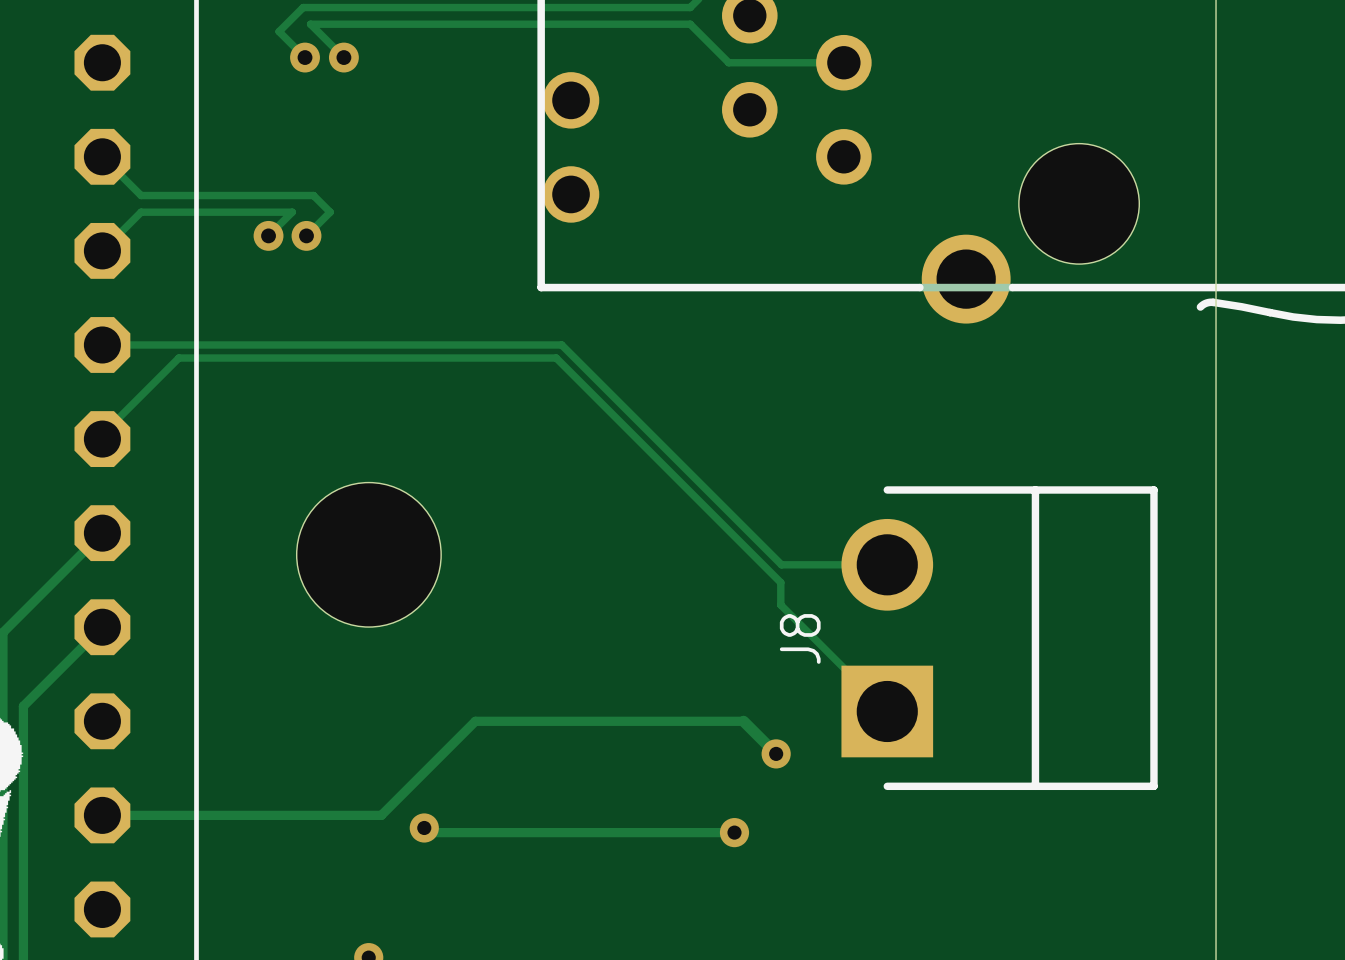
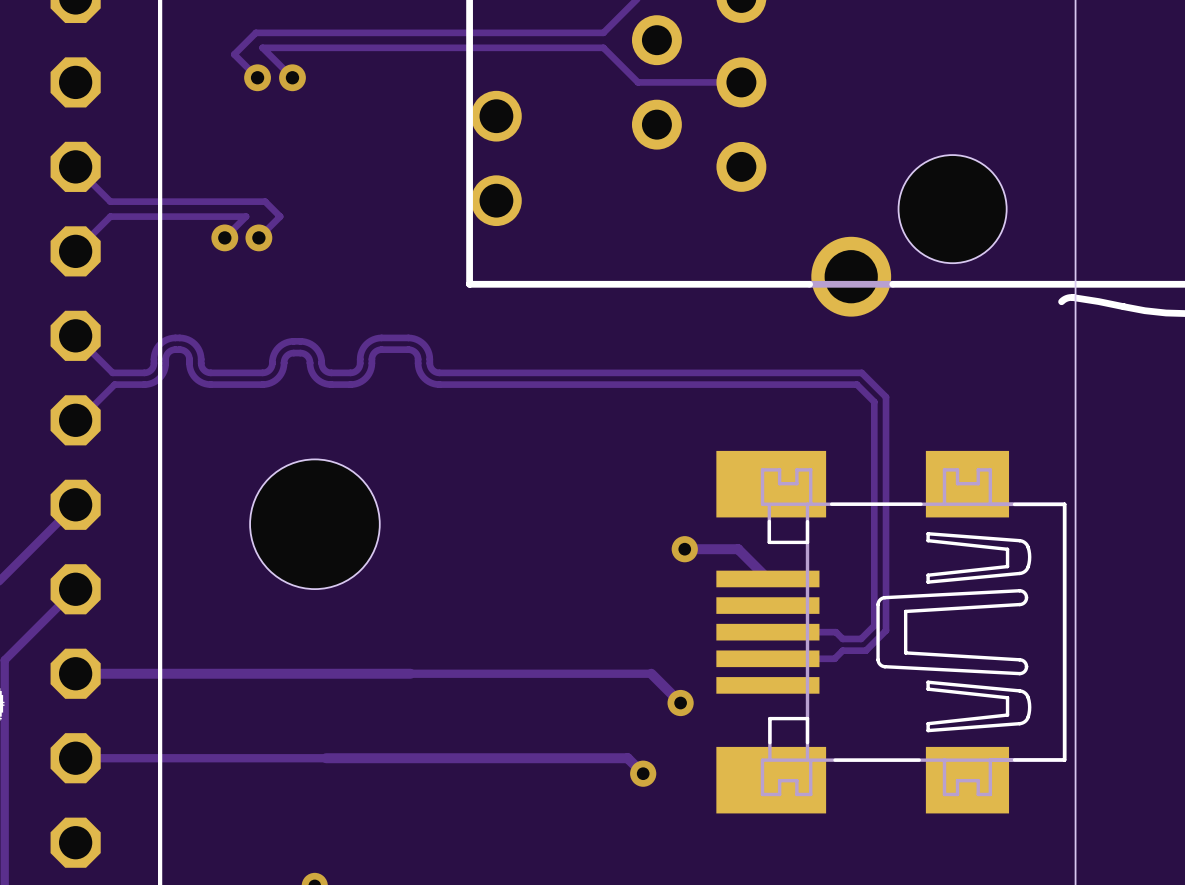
track: (102, 344) (561, 344) (781, 564) (887, 564) -> (75, 335) (112, 372) (149, 371) (153, 366) (154, 353) (158, 346) (167, 339) (175, 337) (185, 338) (194, 344) (200, 353) (201, 366) (208, 372) (263, 372) (270, 369) (272, 363)
track: none -> (272, 362) (273, 354) (278, 347) (285, 342) (293, 341) (305, 342) (313, 345) (318, 352) (321, 362)
track: none -> (284, 362) (286, 355) (293, 353) (305, 354) (310, 362)
track: none -> (310, 363) (311, 371) (316, 378) (323, 382) (331, 384) (353, 384) (363, 380) (370, 371) (373, 354) (381, 349) (413, 350) (417, 355) (418, 368) (422, 376) (428, 381) (436, 384) (856, 384) (874, 401) (874, 625) (861, 638) (842, 638) (835, 632) (767, 632)
track: none -> (321, 363) (323, 369) (328, 372) (353, 372) (359, 366) (363, 348) (370, 340) (378, 338) (408, 337) (419, 340) (425, 346) (429, 353) (430, 366) (438, 372) (861, 372) (886, 397) (886, 630) (865, 650) (842, 650) (834, 658) (767, 658)
track: (102, 439) (102, 434) (178, 358) (556, 358) (780, 582) (780, 605) (887, 711) -> (75, 420) (78, 420) (114, 384) (147, 384) (157, 380) (164, 371) (167, 354) (172, 349) (181, 349) (186, 352) (193, 376) (200, 381) (208, 384) (268, 383) (279, 376) (284, 363)
track: none -> (684, 549) (738, 549) (767, 578)
via: none -> (684, 549)
J8: (999, 638) -> none
part: none -> (891, 632)
track: (475, 721) (381, 815) -> (410, 673) (75, 673)
track: (424, 827) (428, 832) (734, 832) -> (326, 758) (627, 758) (643, 773)
via: (424, 827) -> none

